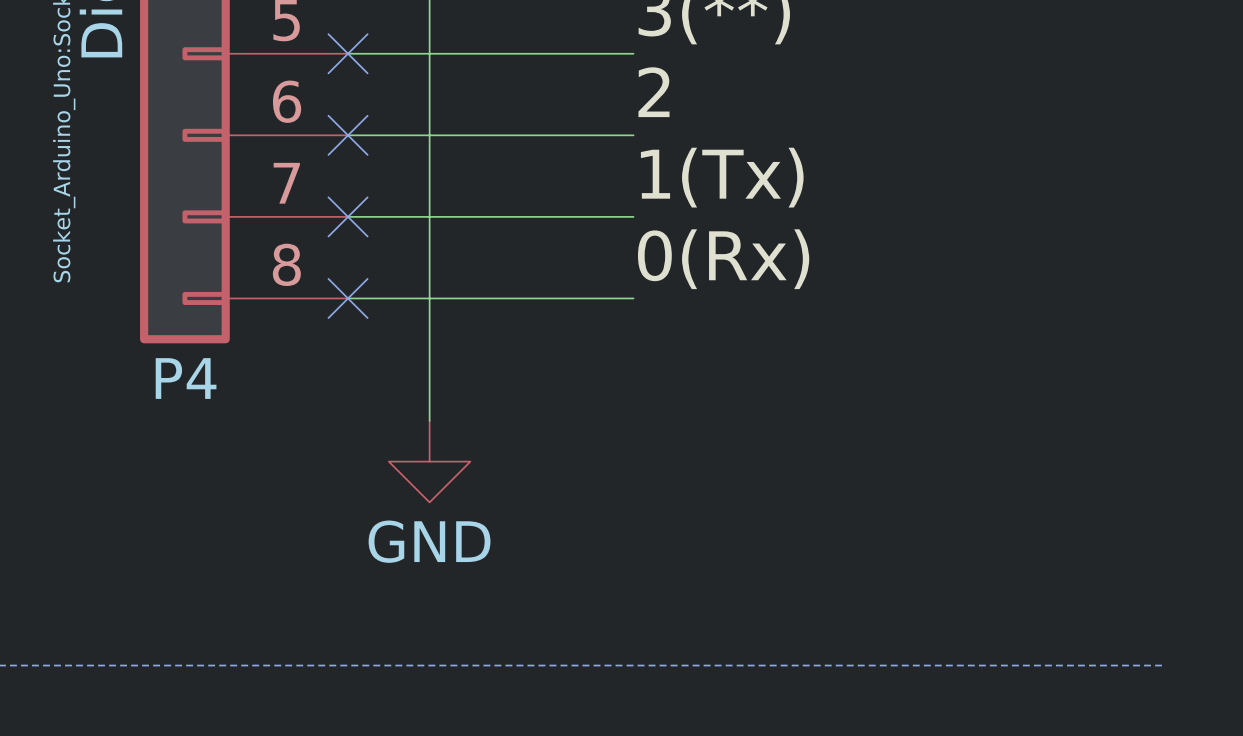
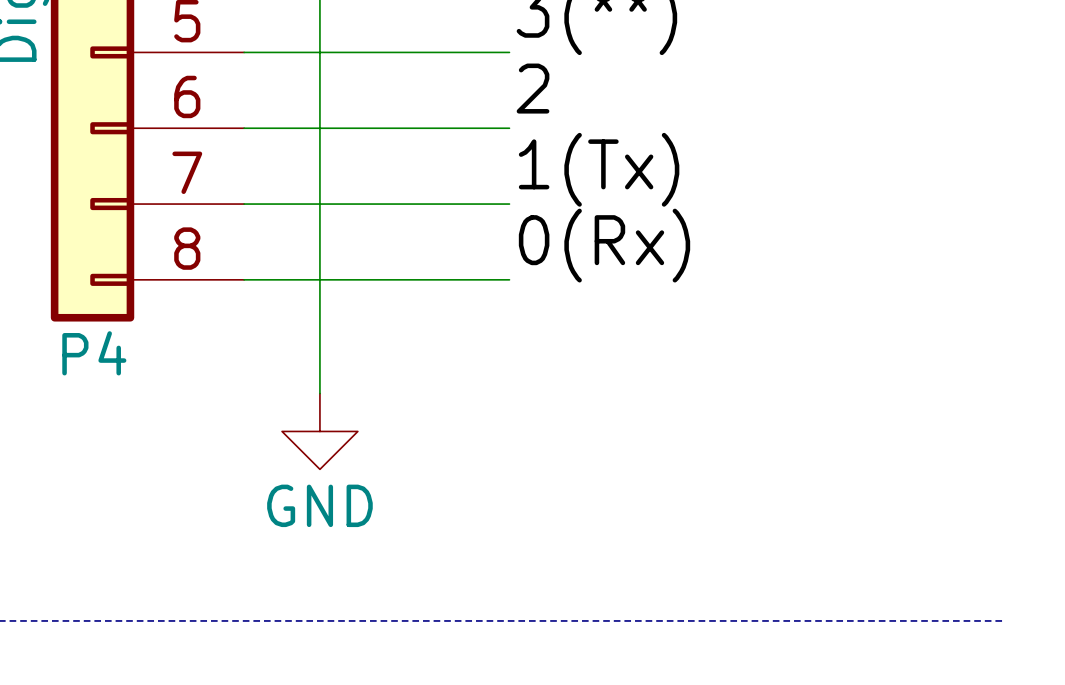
no-connect mark: (348, 53) -> none
no-connect mark: (348, 135) -> none
no-connect mark: (348, 216) -> none
no-connect mark: (348, 298) -> none

